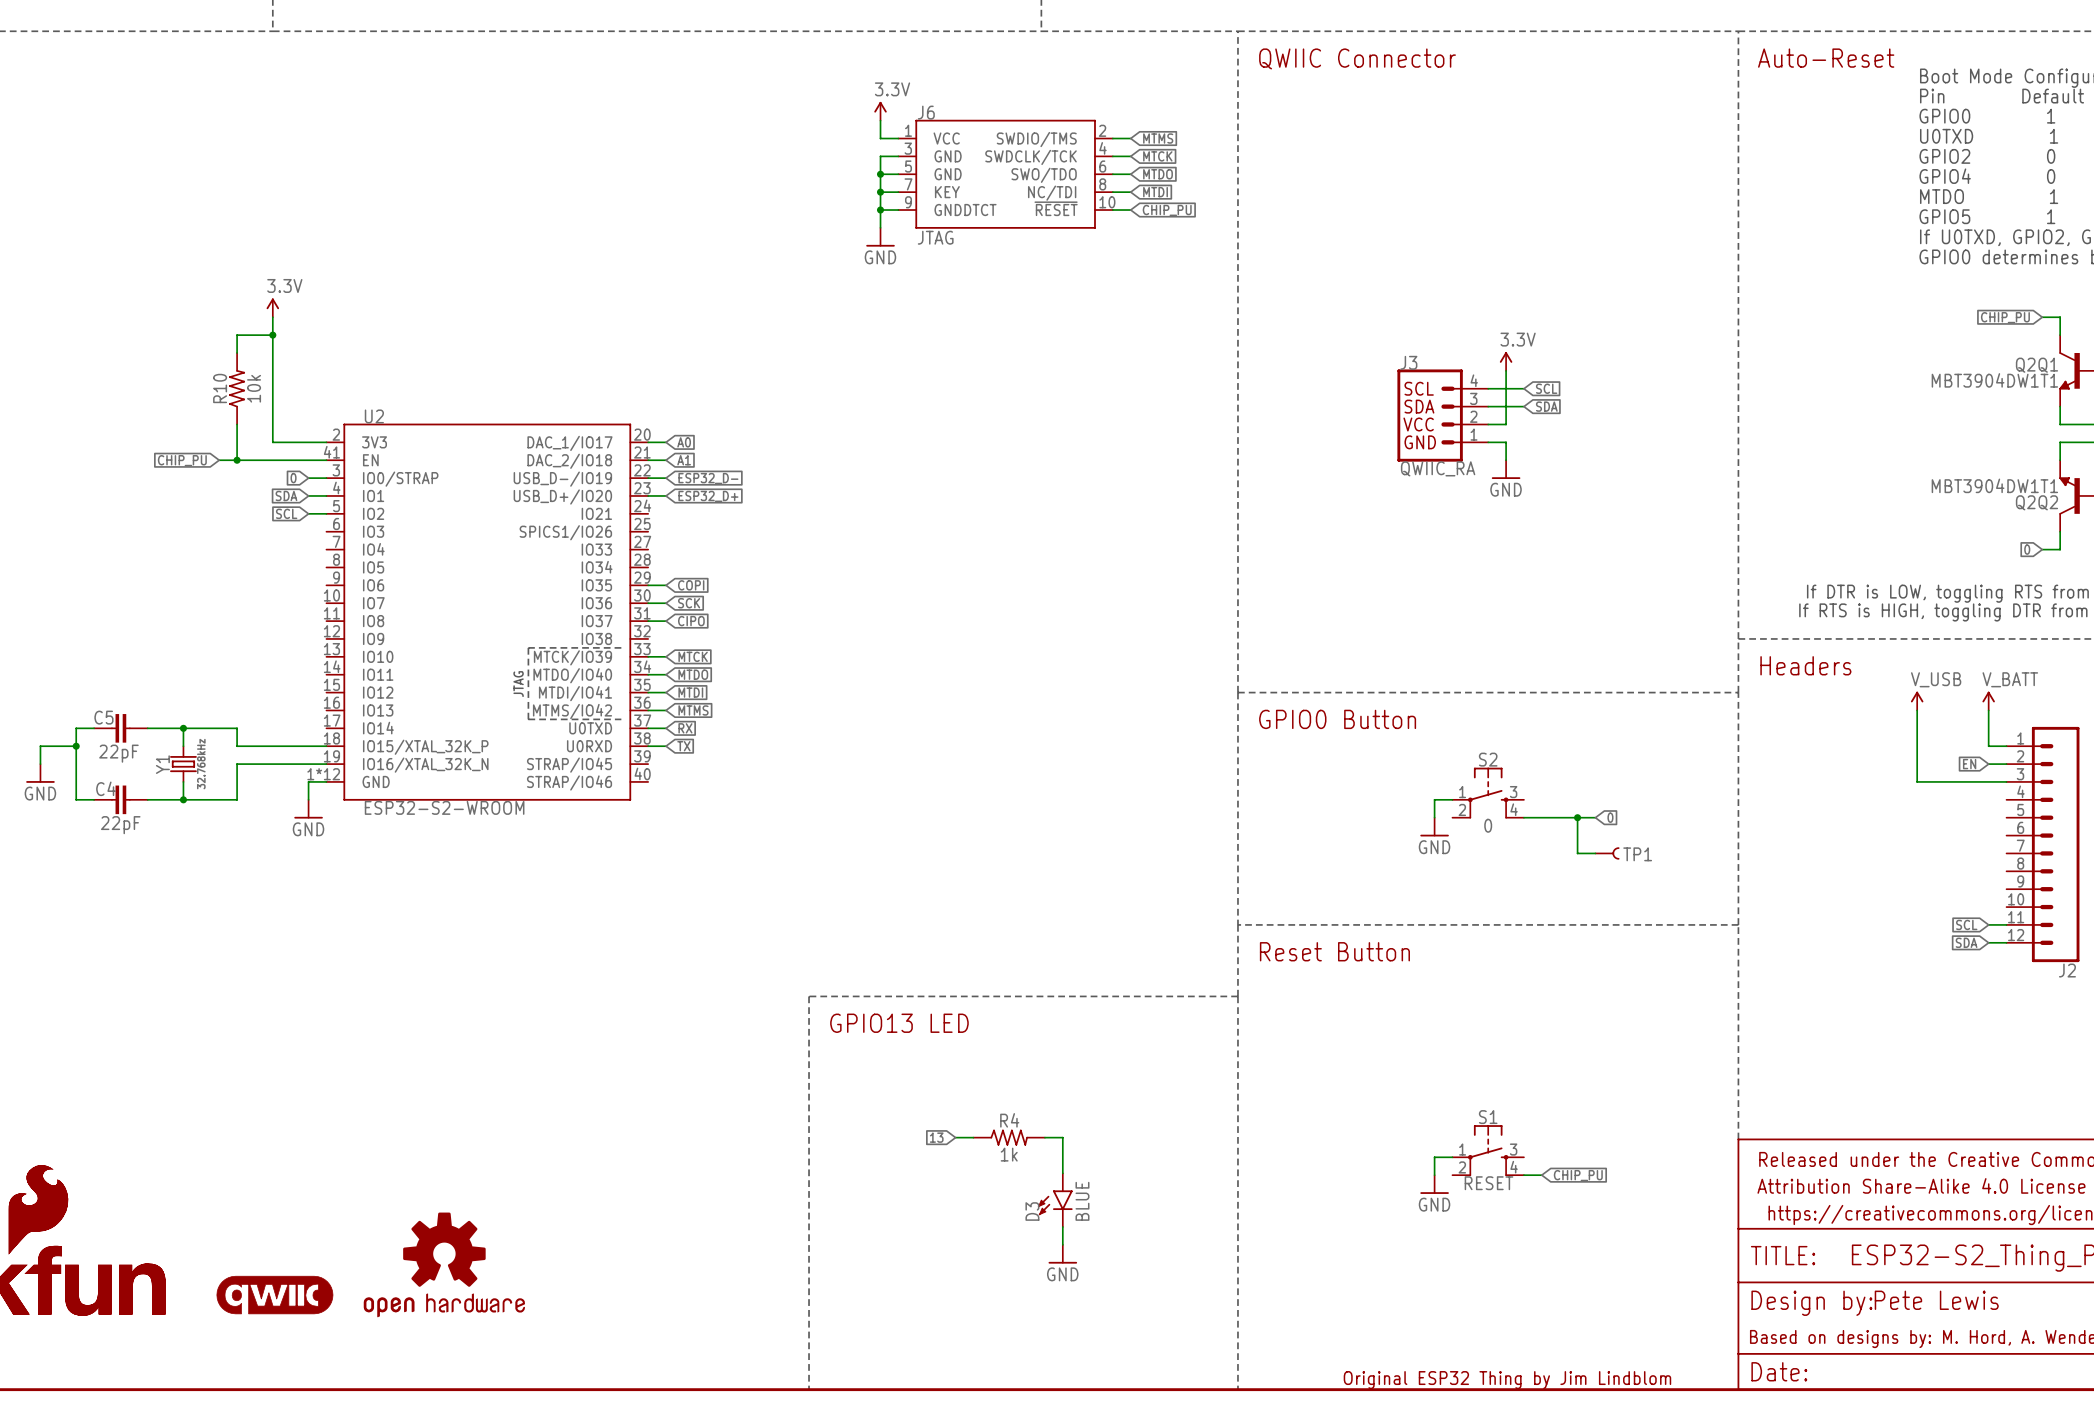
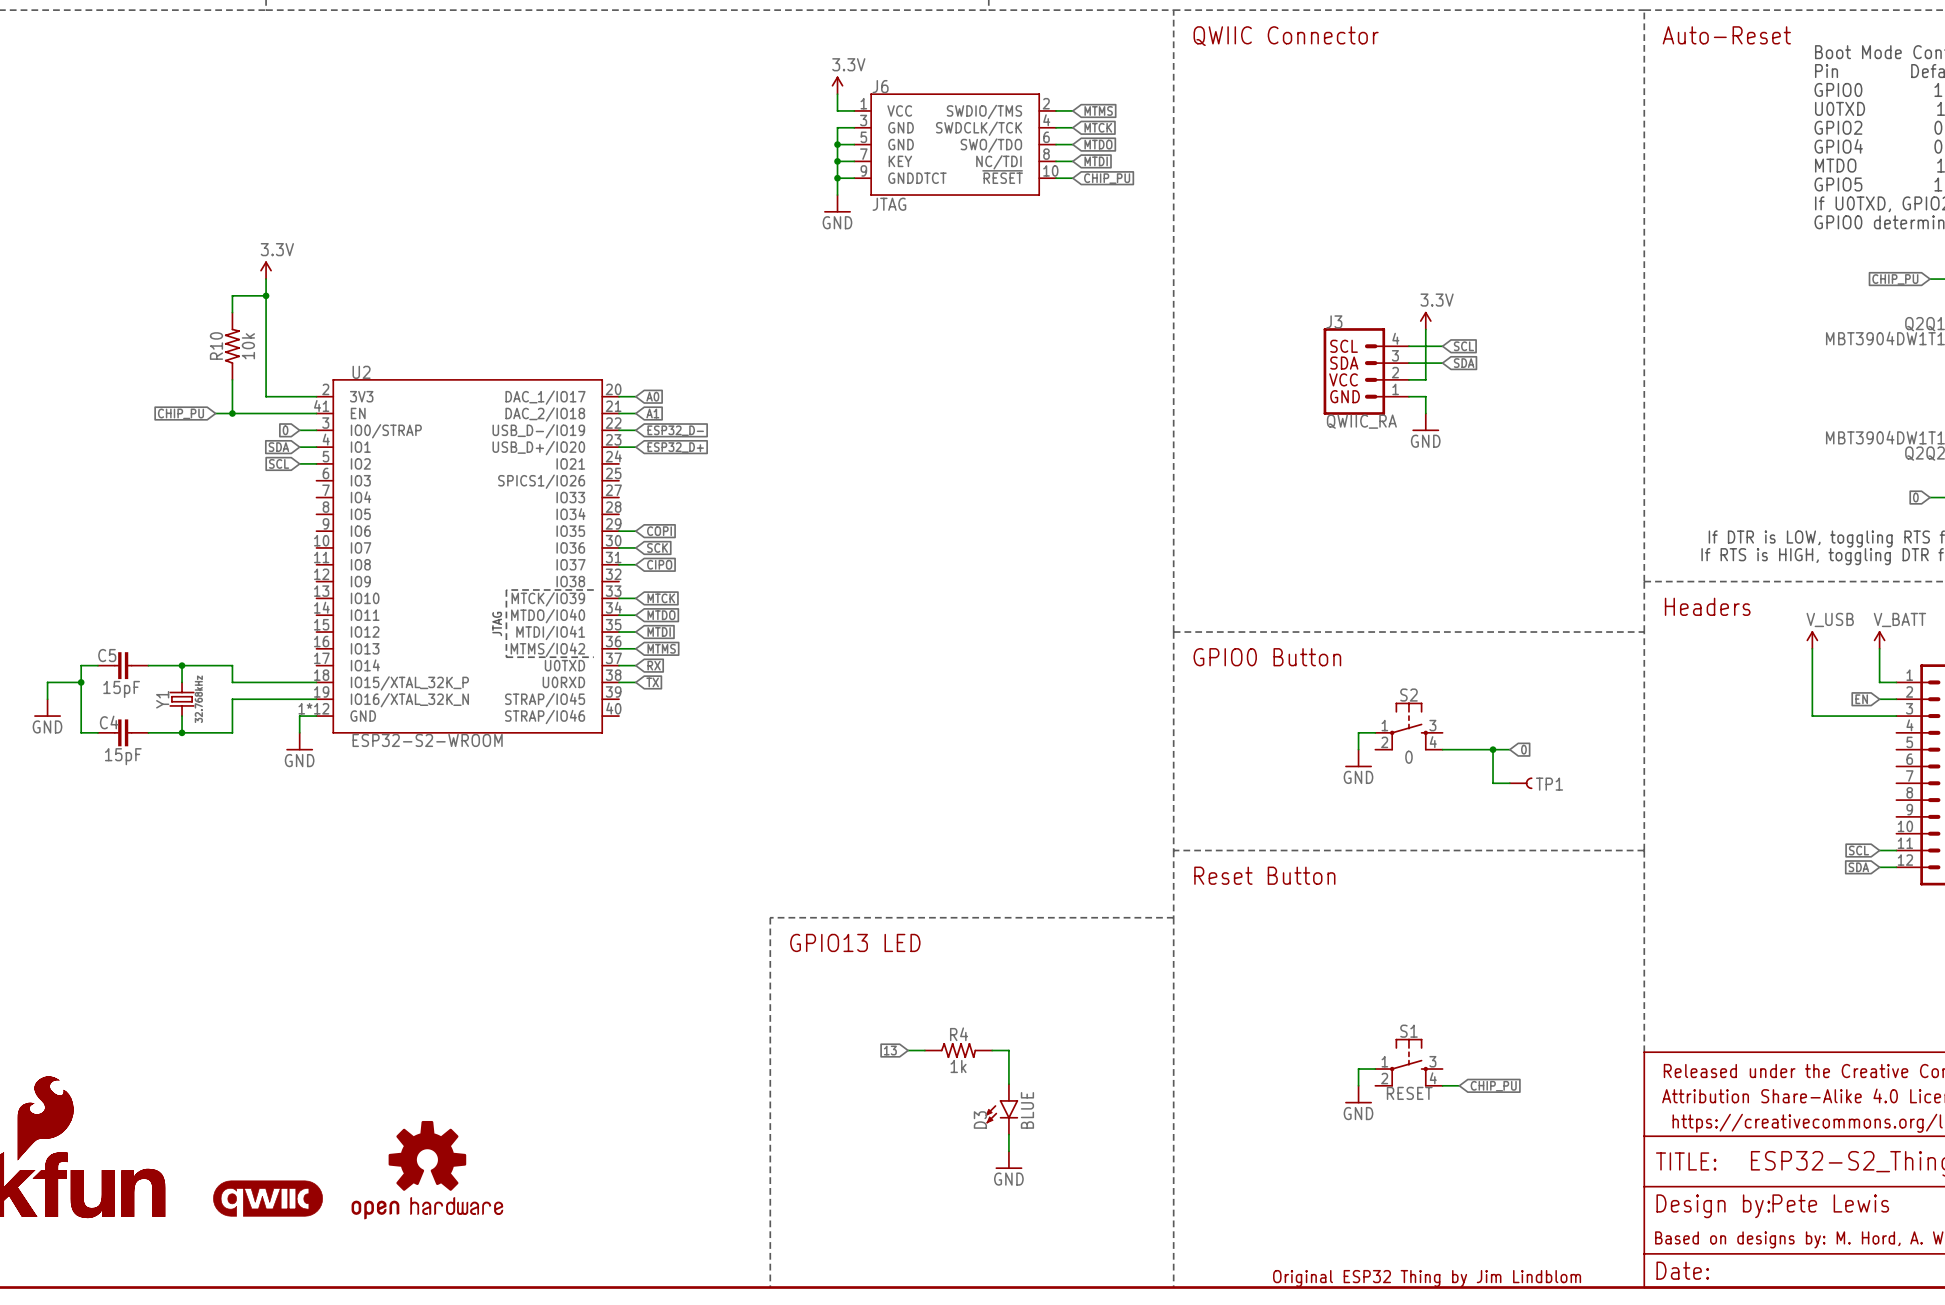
C5 value: 22pF (118, 753) -> 15pF (121, 689)
C4 value: 22pF (120, 825) -> 15pF (123, 756)

